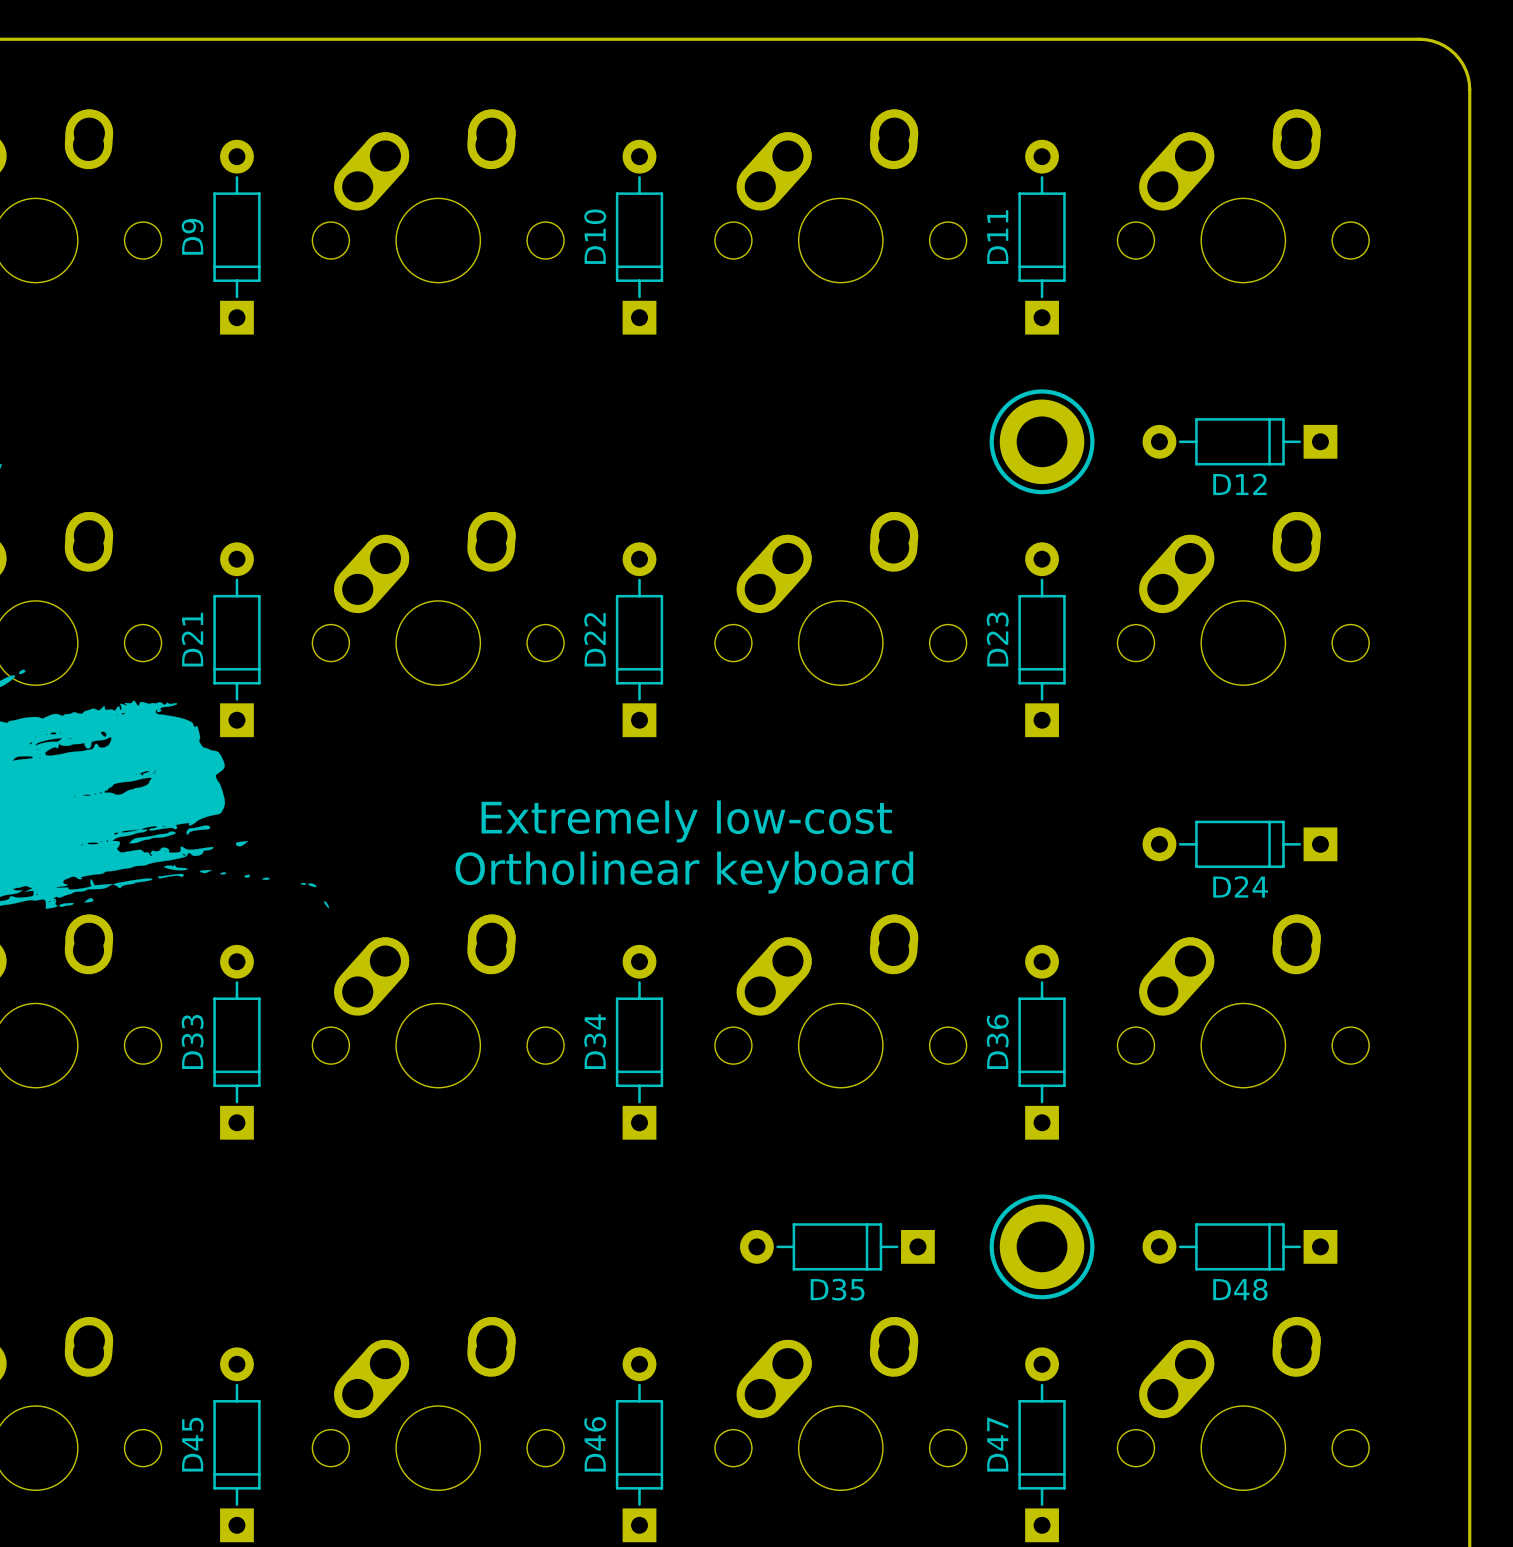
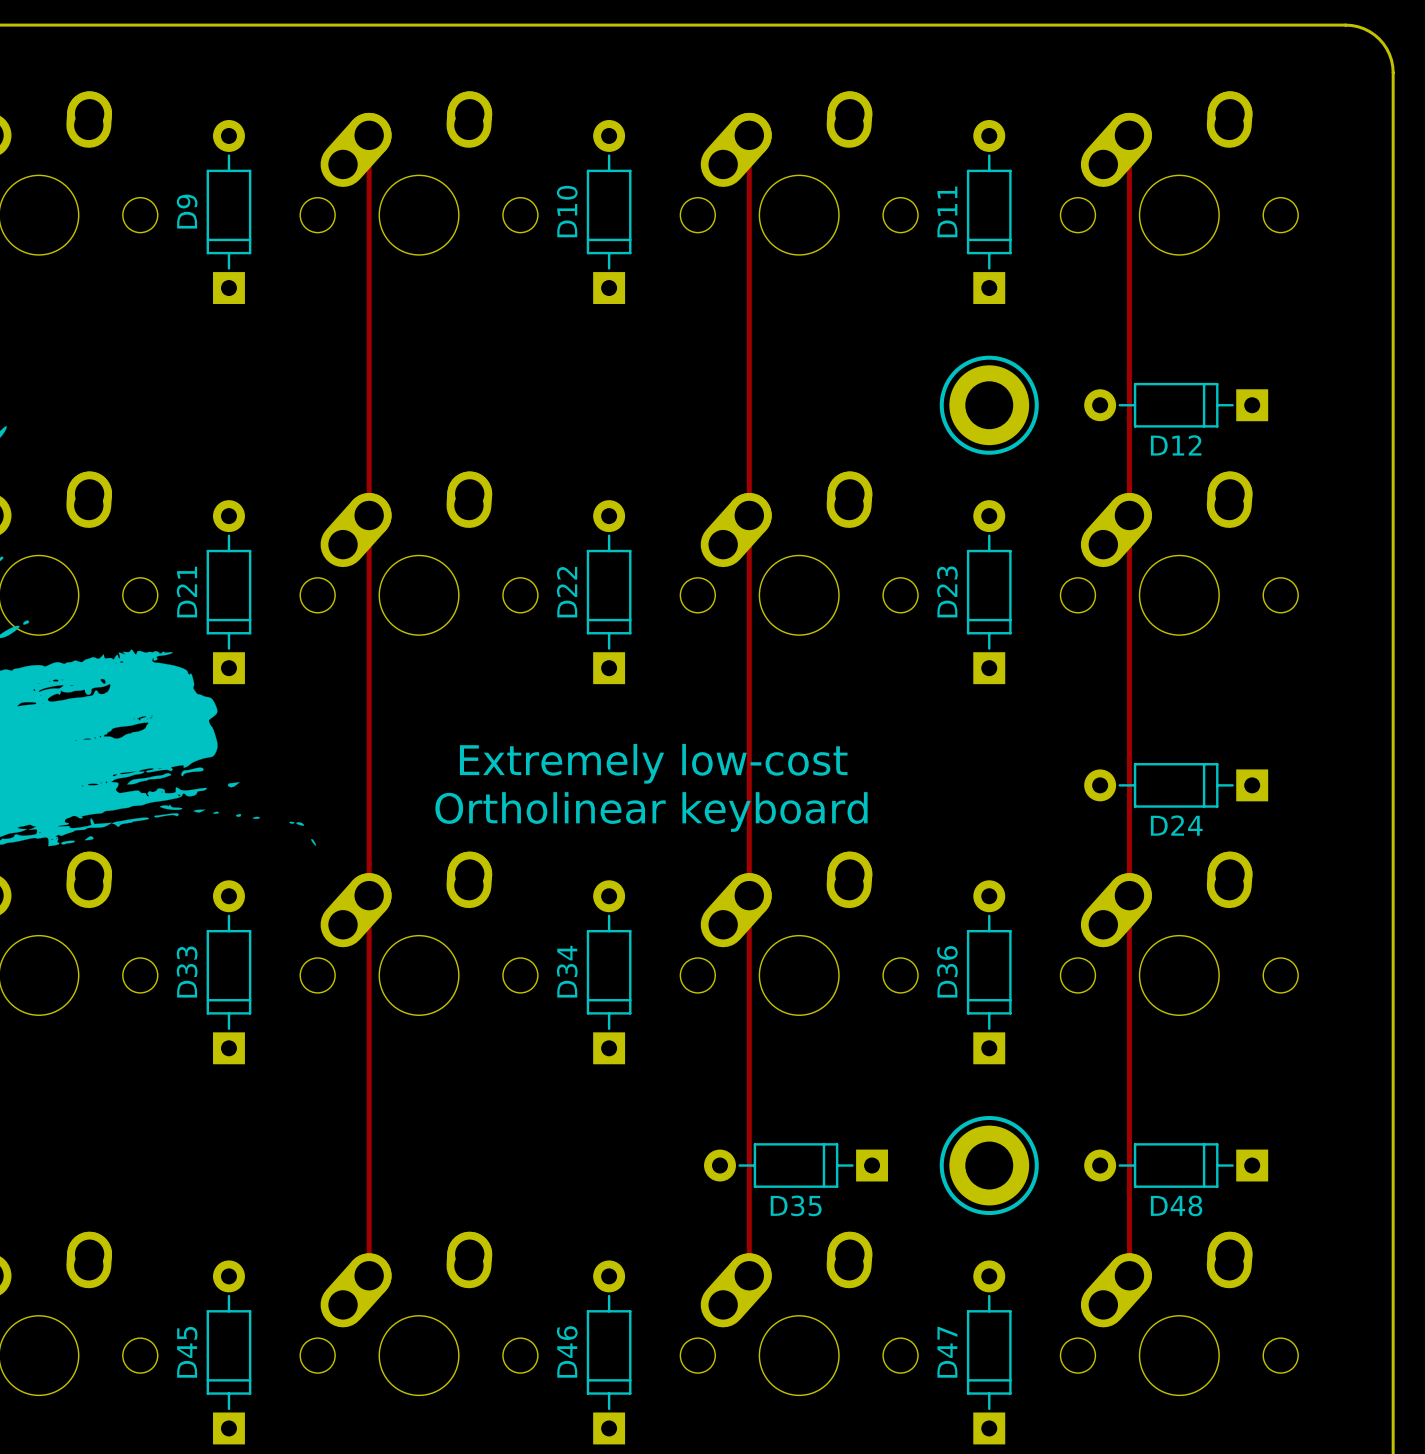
track: none -> (369, 135) (369, 1275)
track: none -> (749, 135) (749, 1278) (723, 1304)
track: none -> (1129, 135) (1129, 1275)

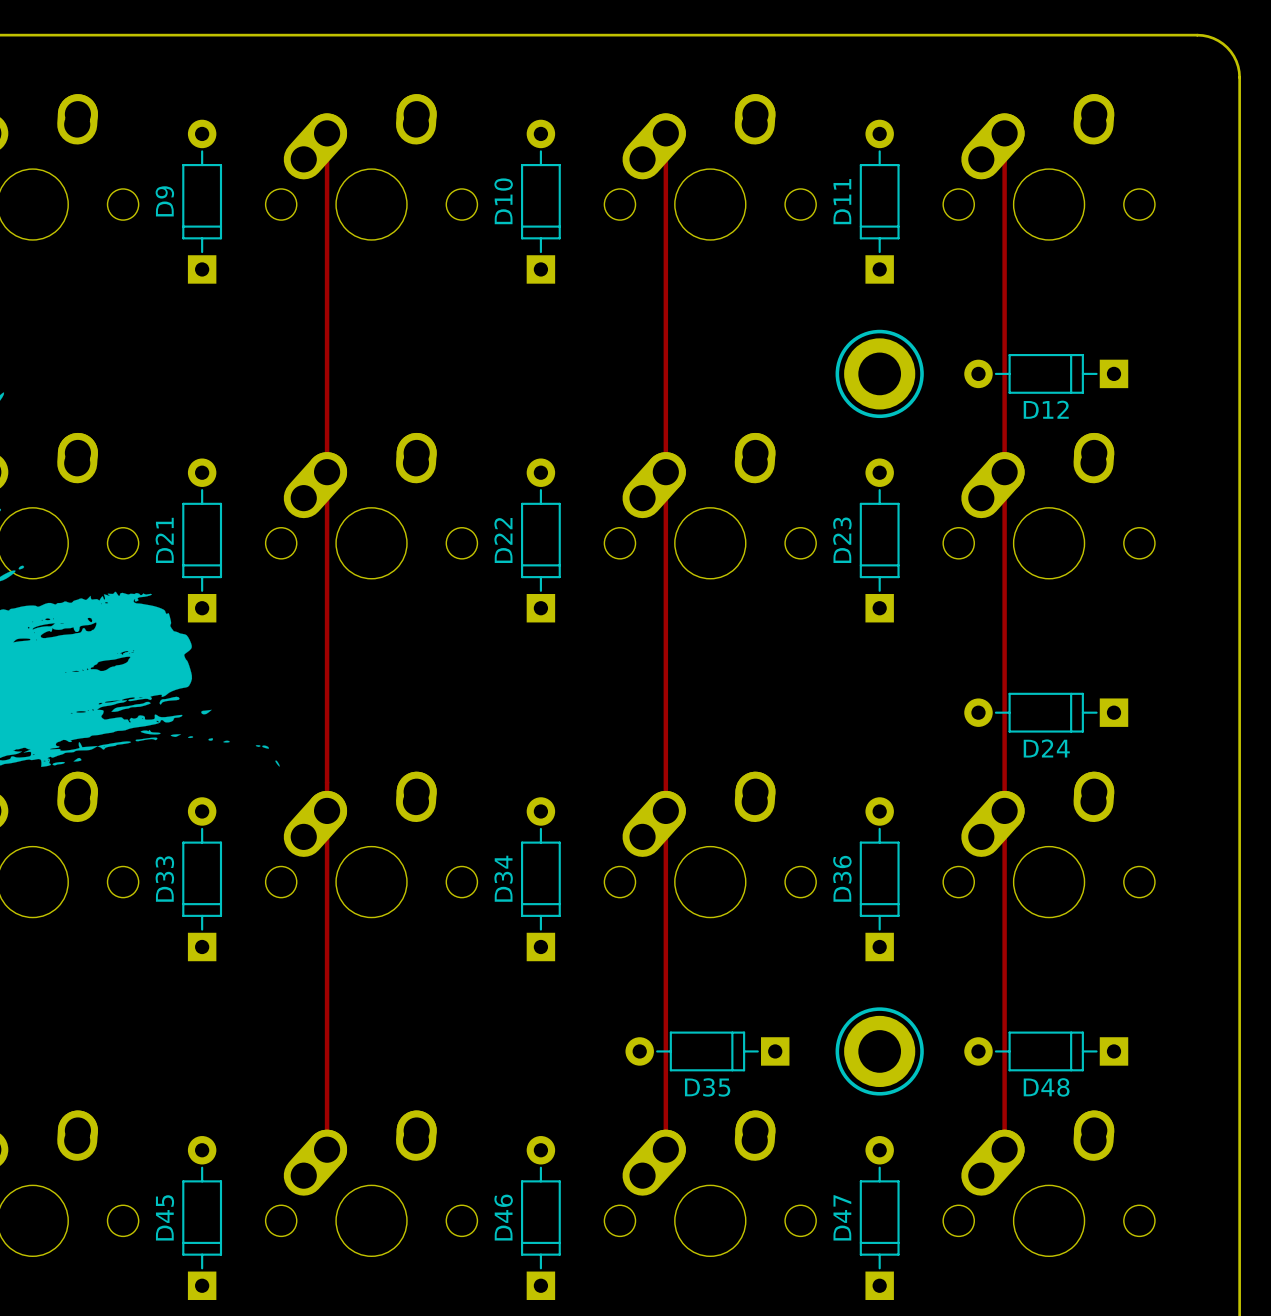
text: Extremely low-cost (653, 763) -> none
text: Ortholinear keyboard (651, 811) -> none

